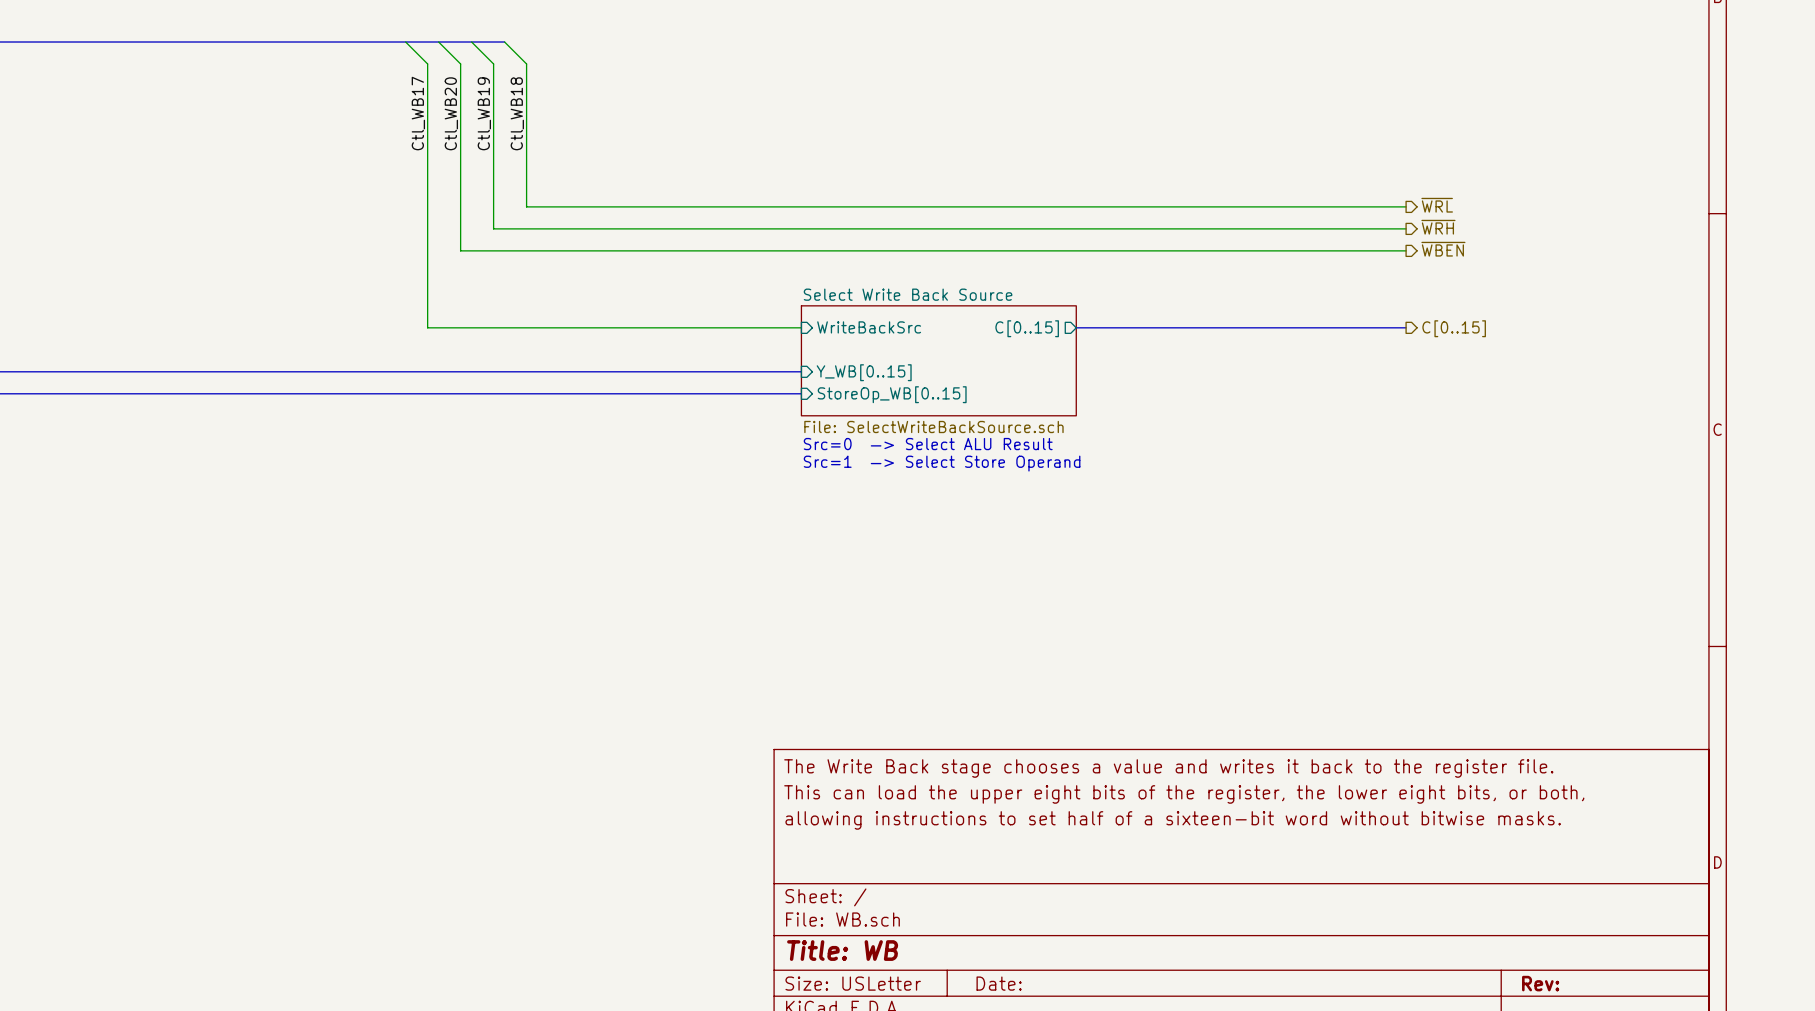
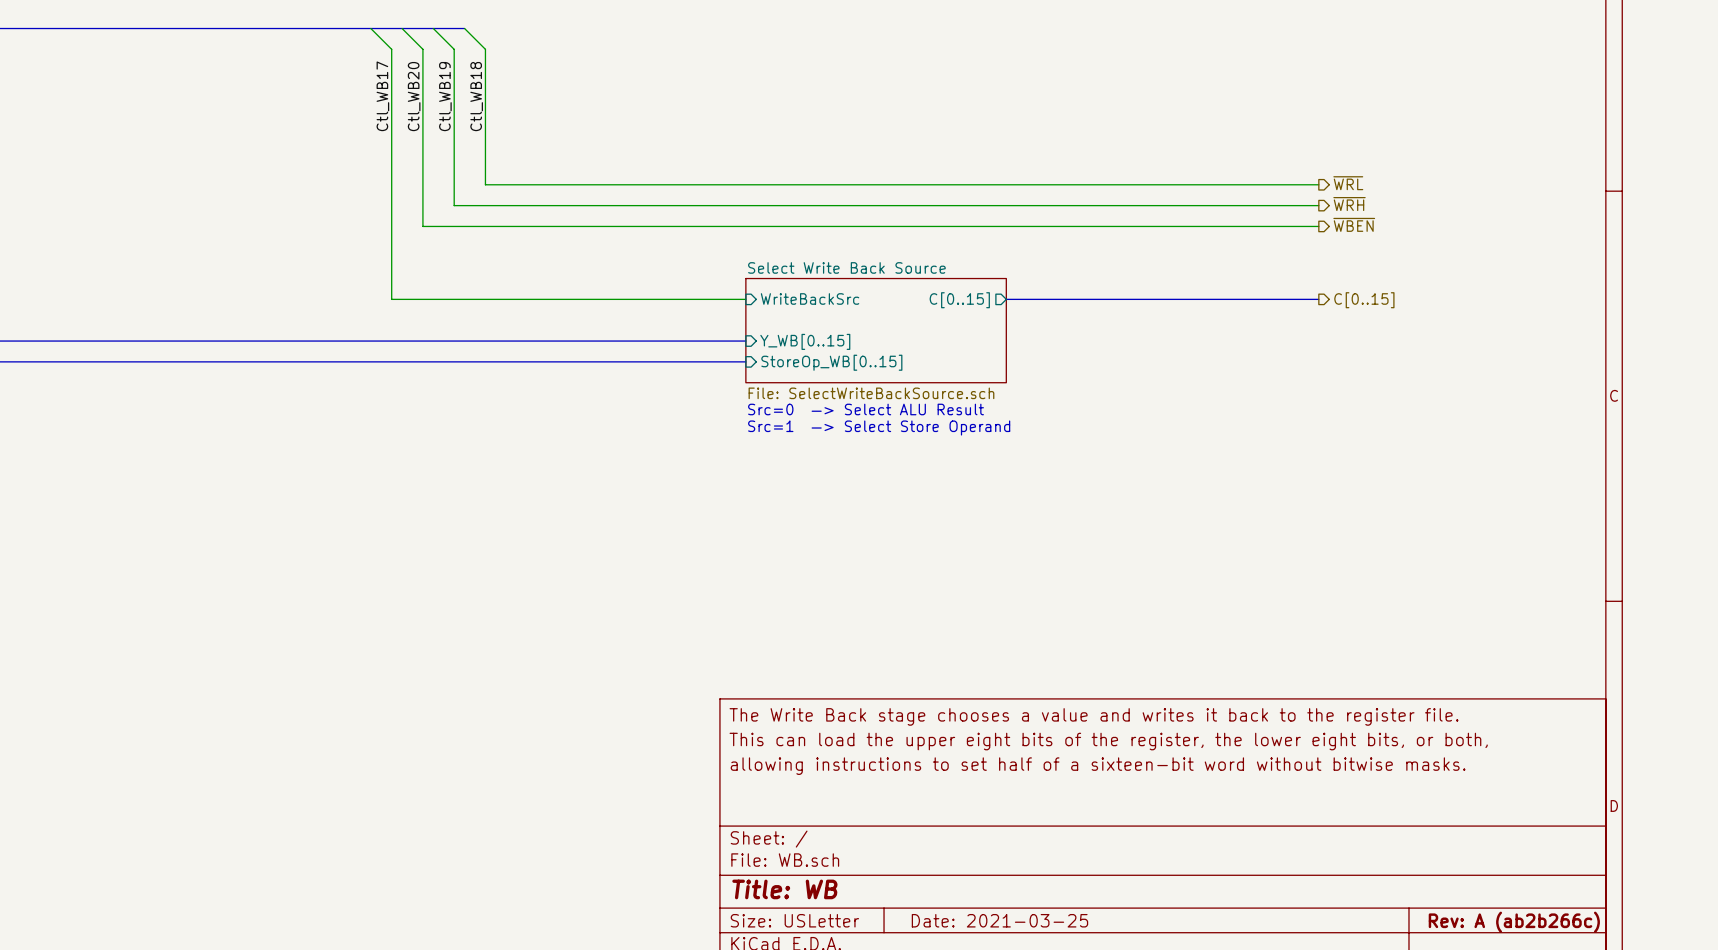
title block: Date: (999, 983) -> Date: 2021-03-25 (999, 920)
title block: Rev: (1540, 983) -> Rev: A (ab2b266c) (1514, 922)

